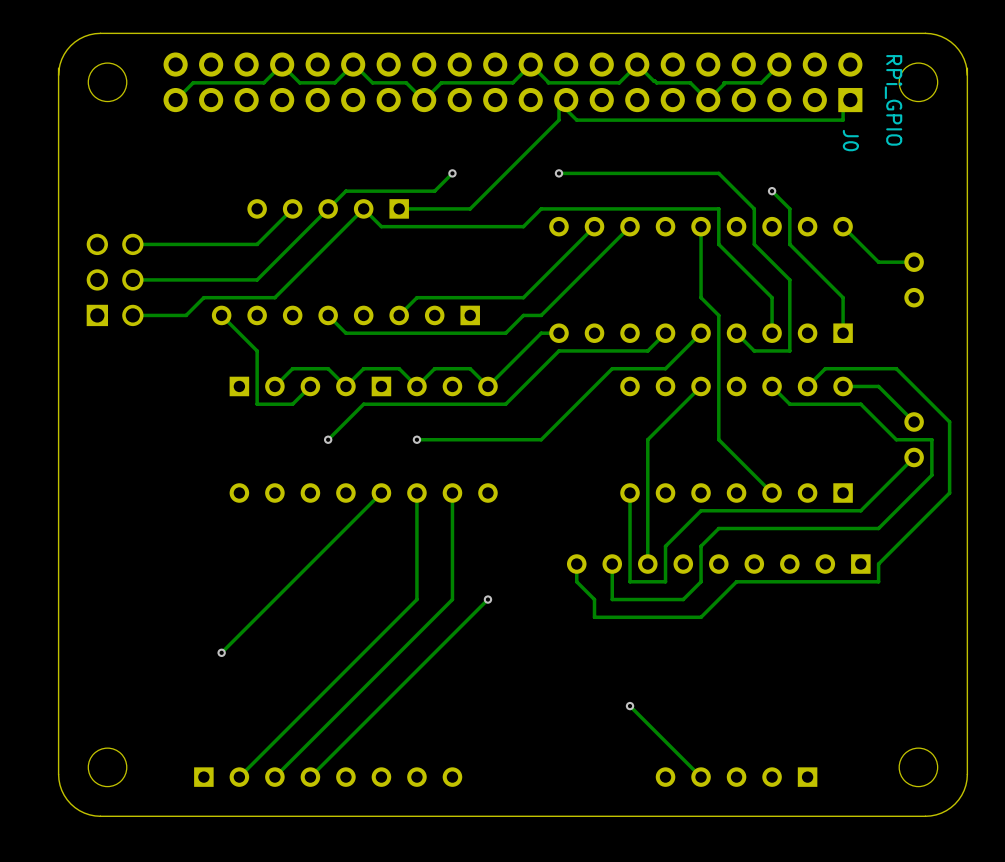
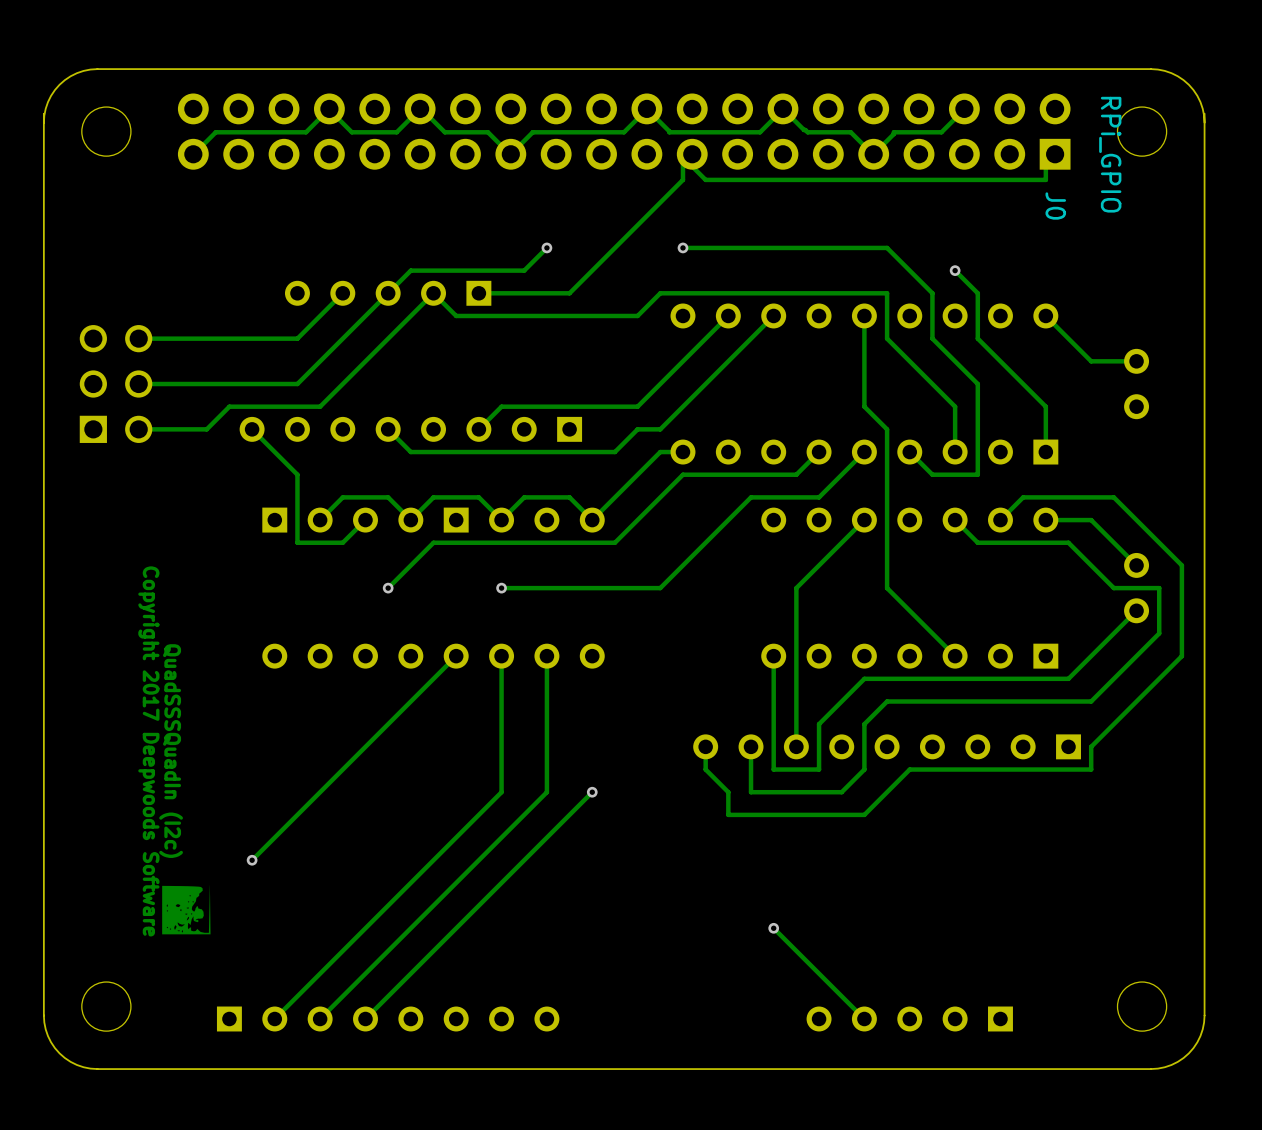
text: none -> Copyright 2017 Deepwoods Software (148, 751)
text: none -> QuadSSSQuadIn (I2c) (171, 751)
drawing: none -> [162, 885, 211, 935]

